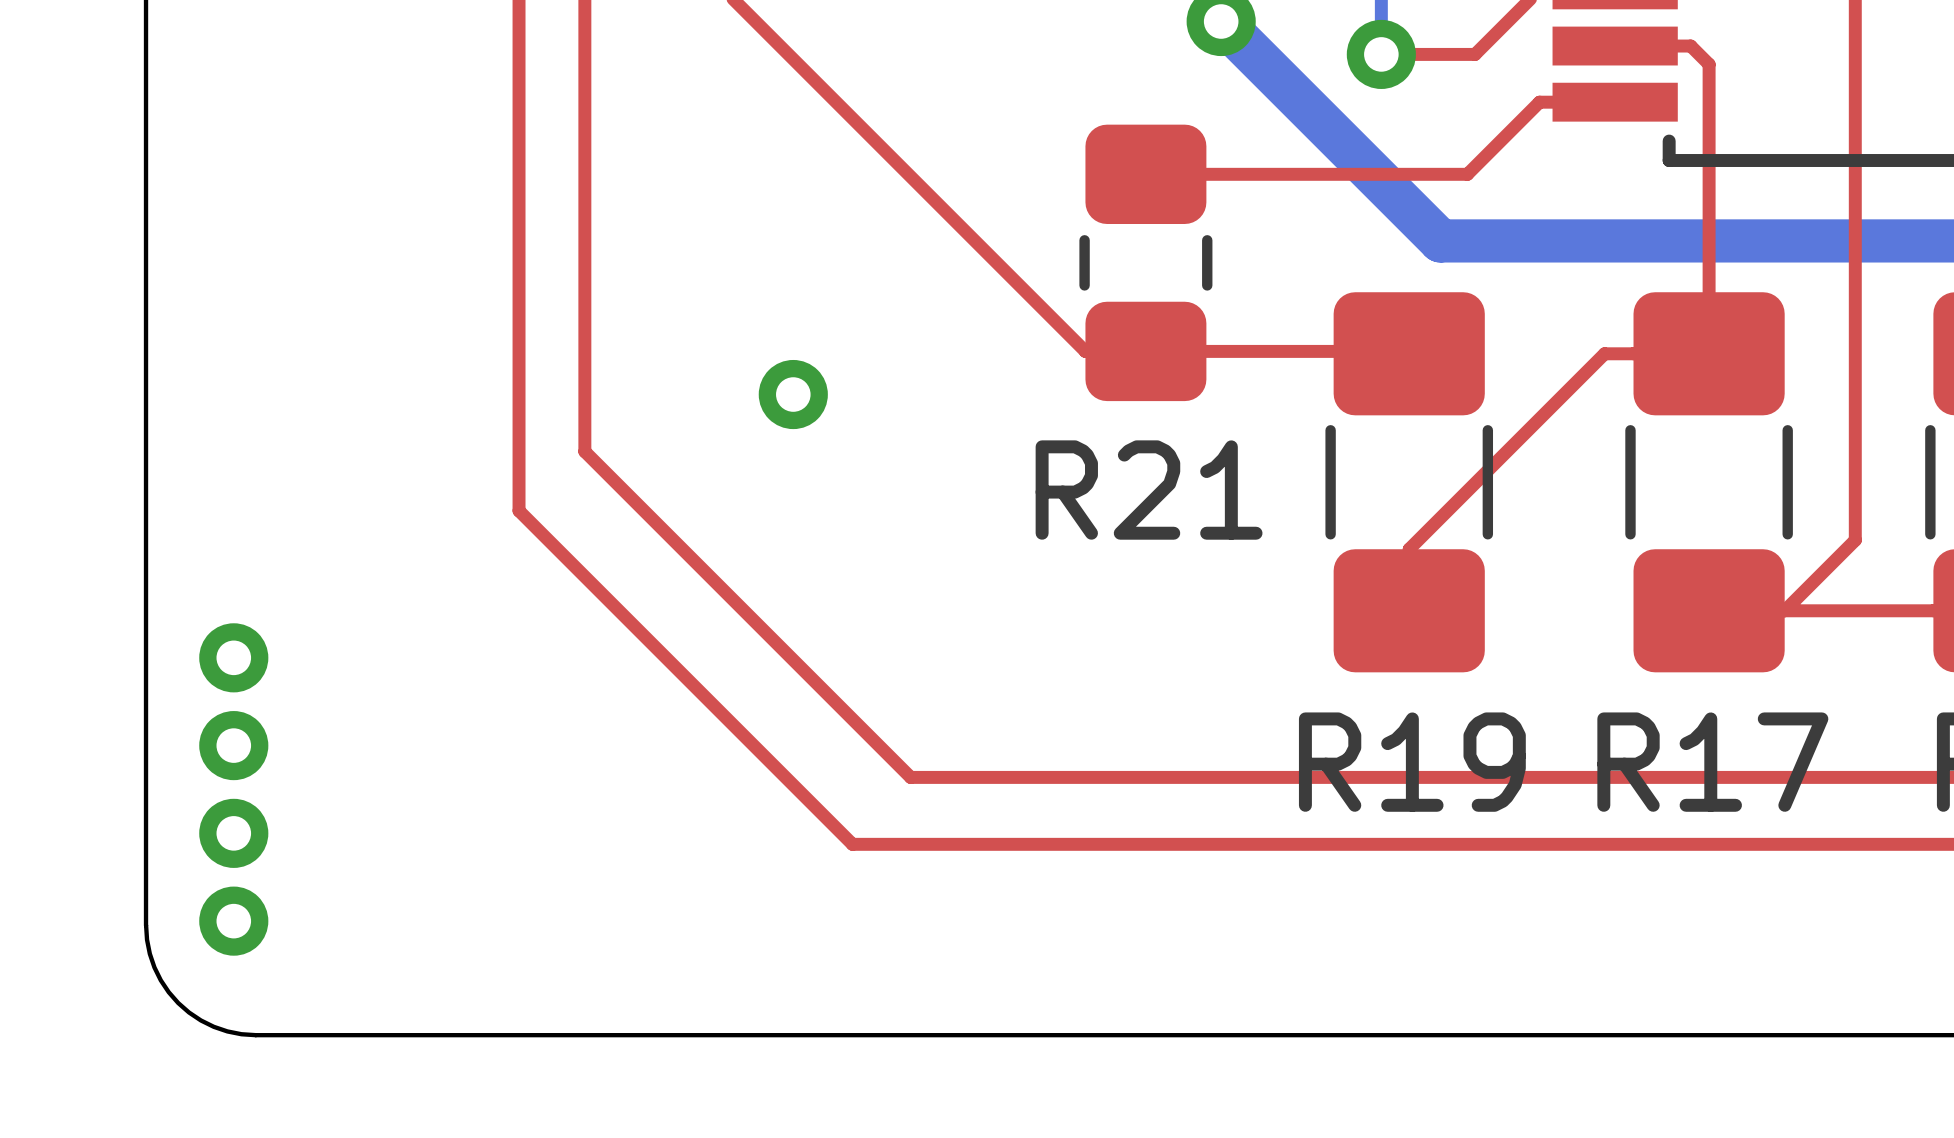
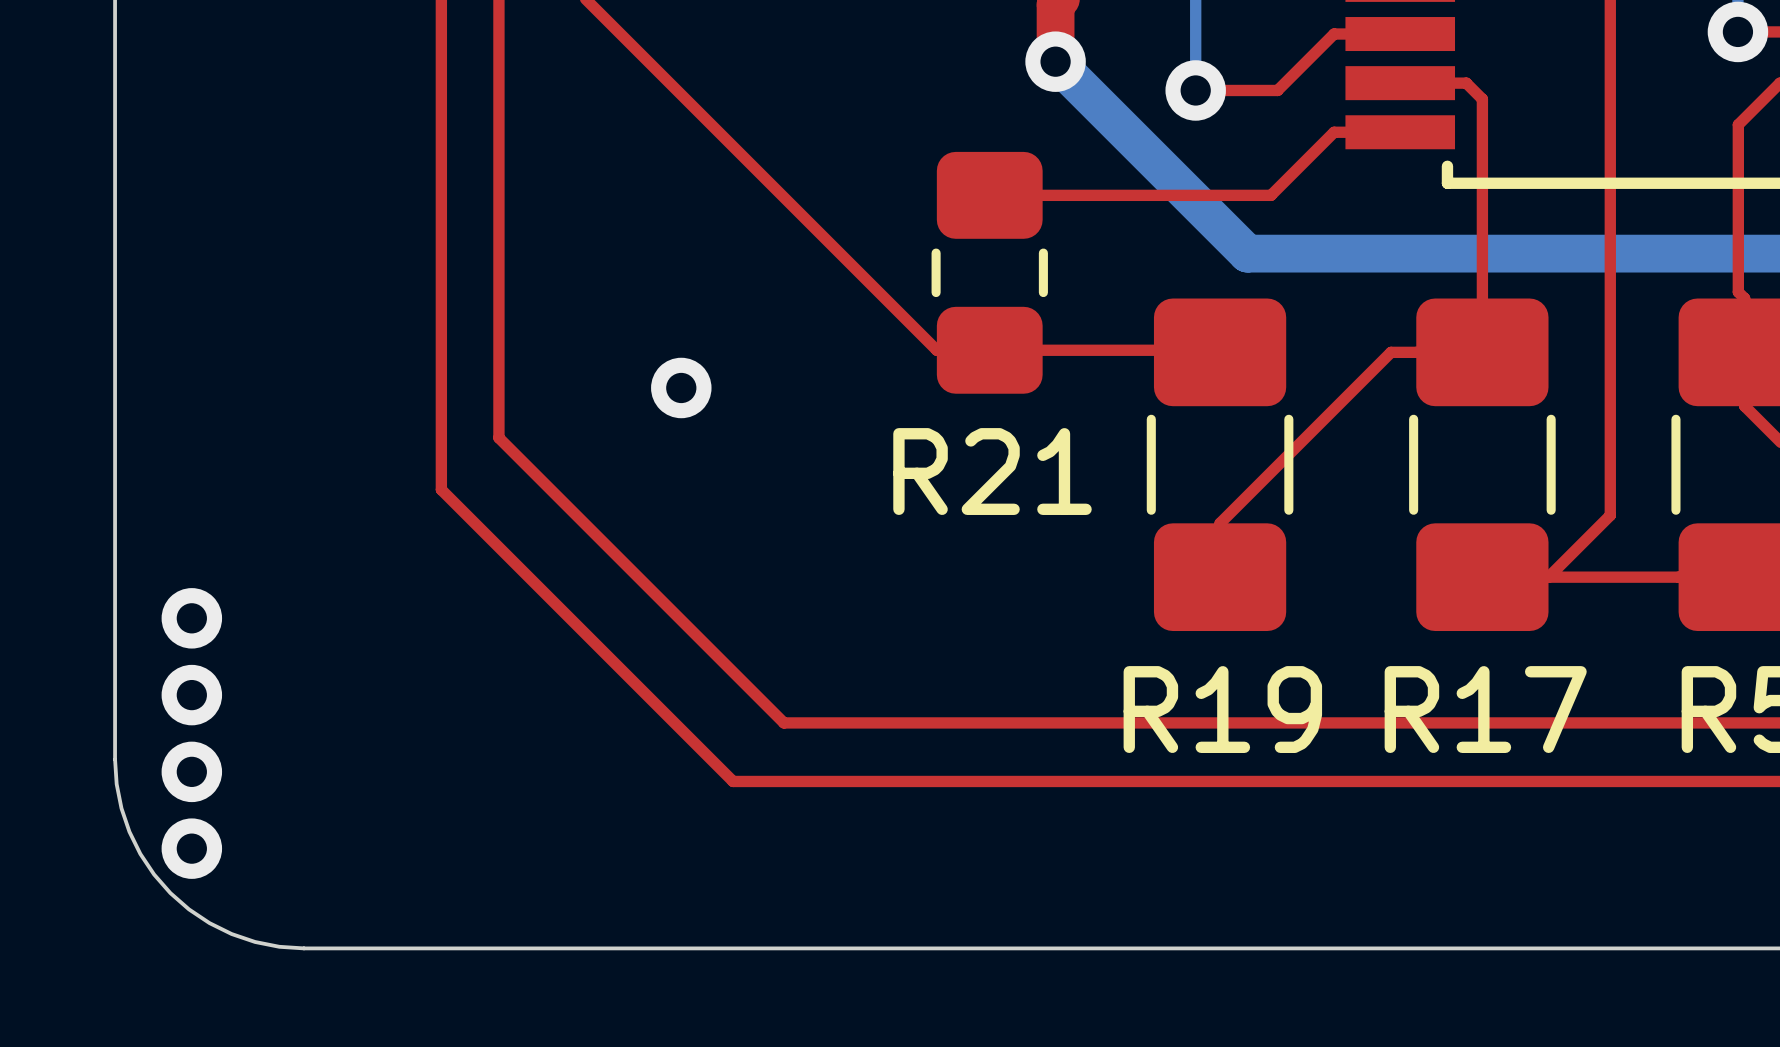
board edge: (146, 819) (147, 939) (154, 967) (160, 980) (178, 1003) (200, 1020) (213, 1026) (241, 1034) (361, 1035) -> (115, 759) (116, 784) (121, 808) (129, 831) (140, 853) (154, 874) (170, 893) (188, 909) (209, 923) (231, 934) (255, 941) (279, 946) (303, 948)

